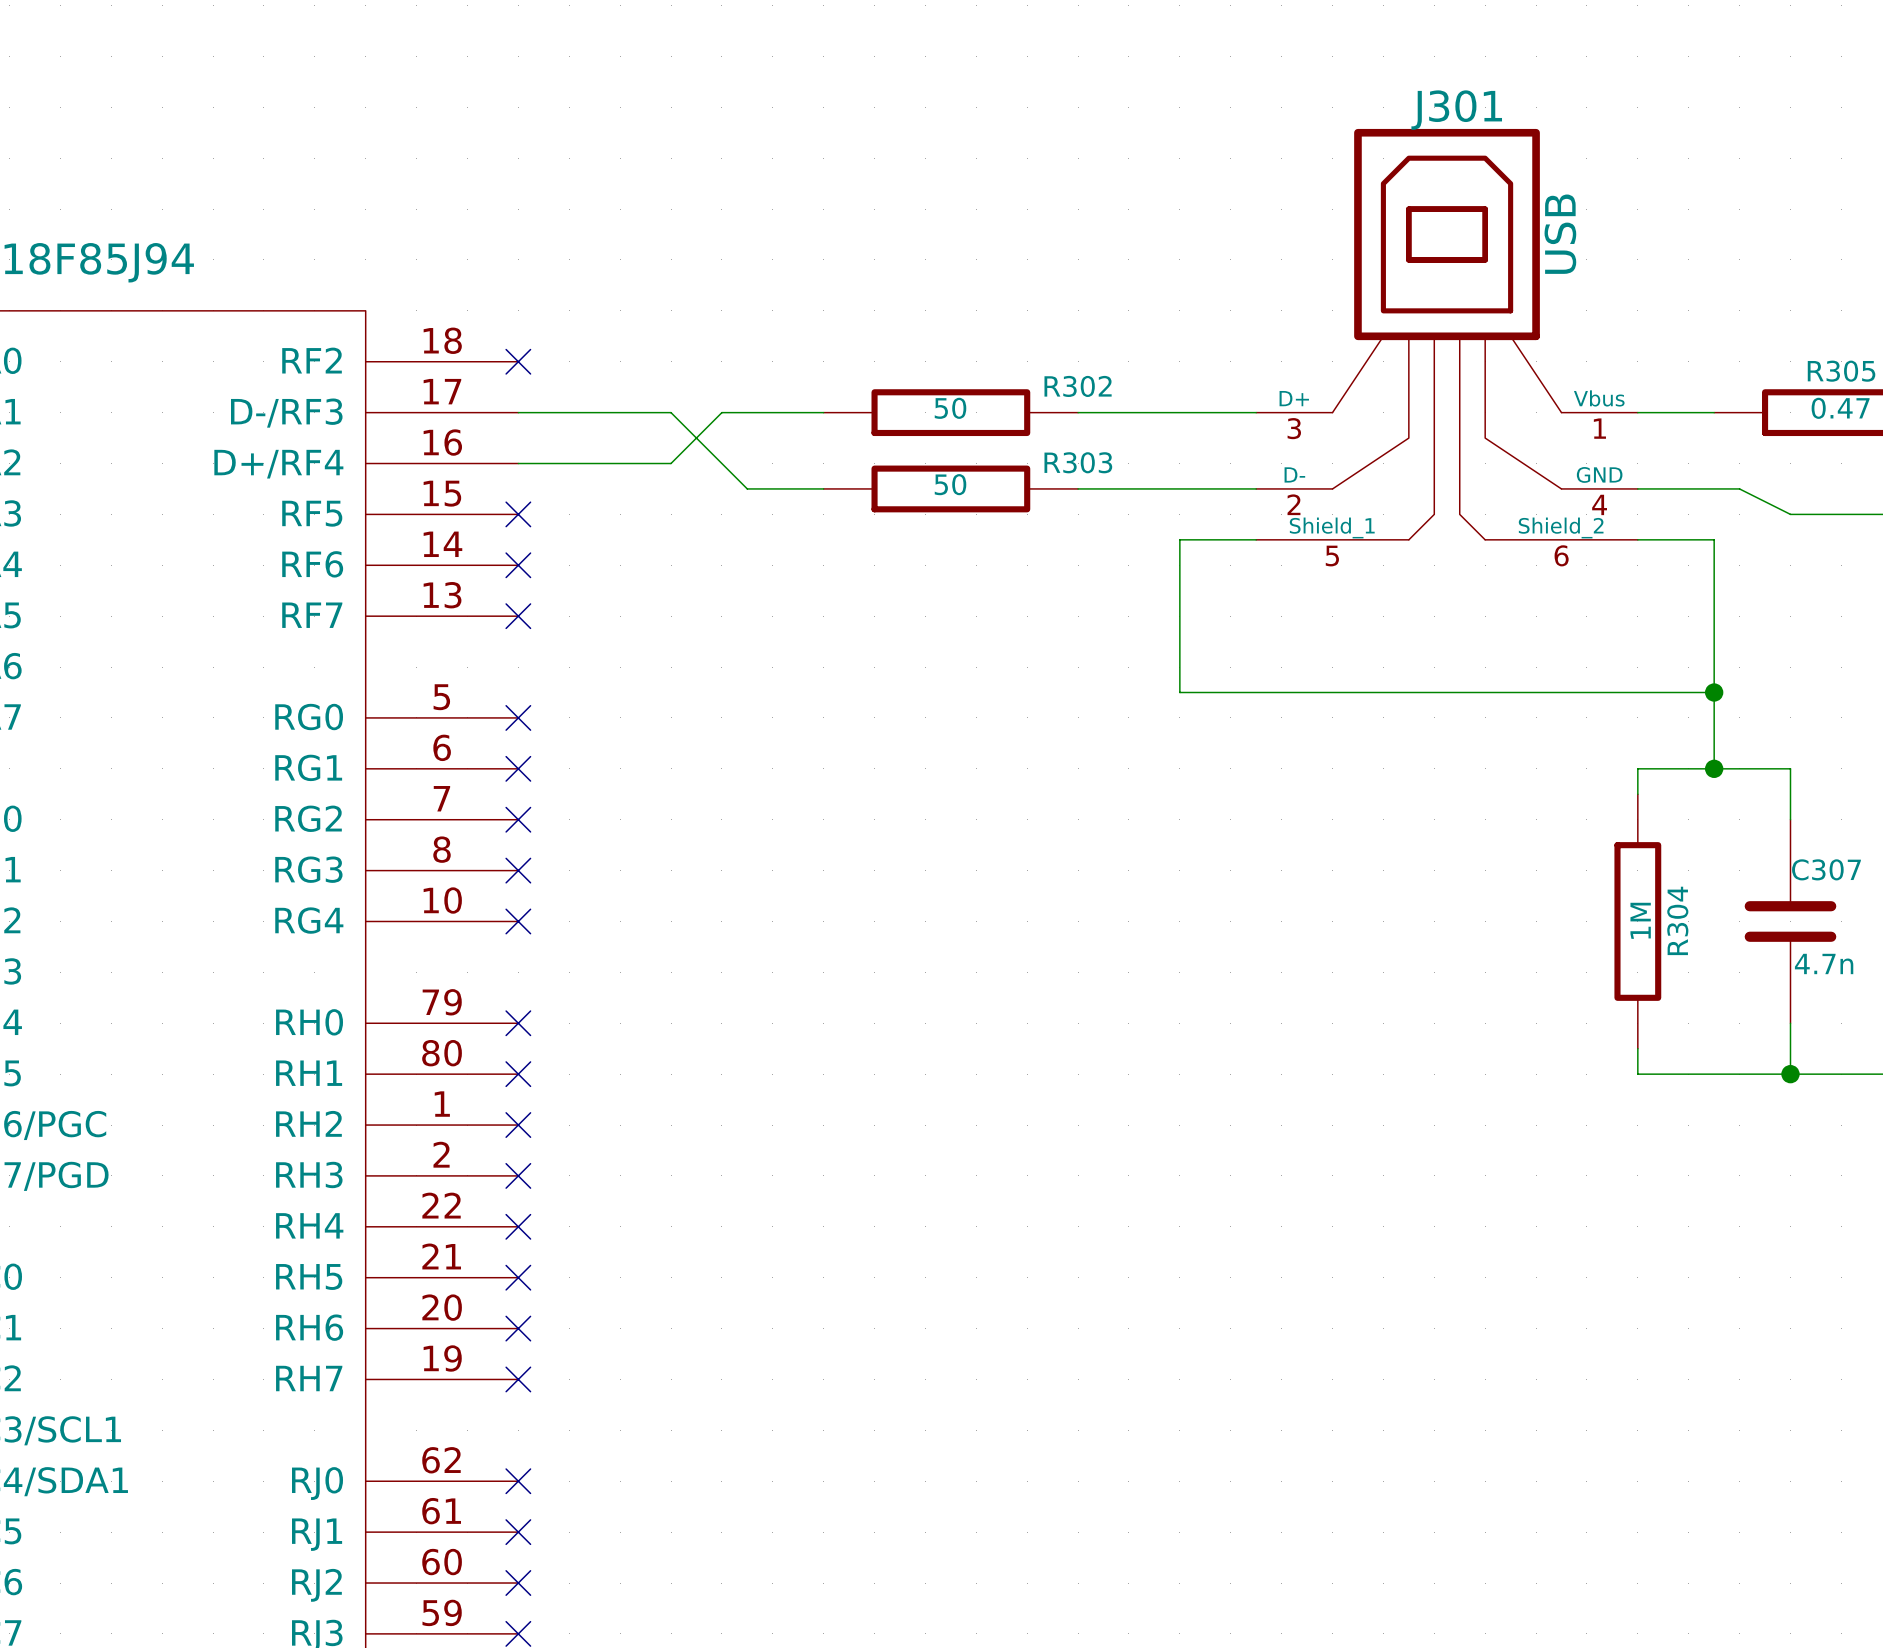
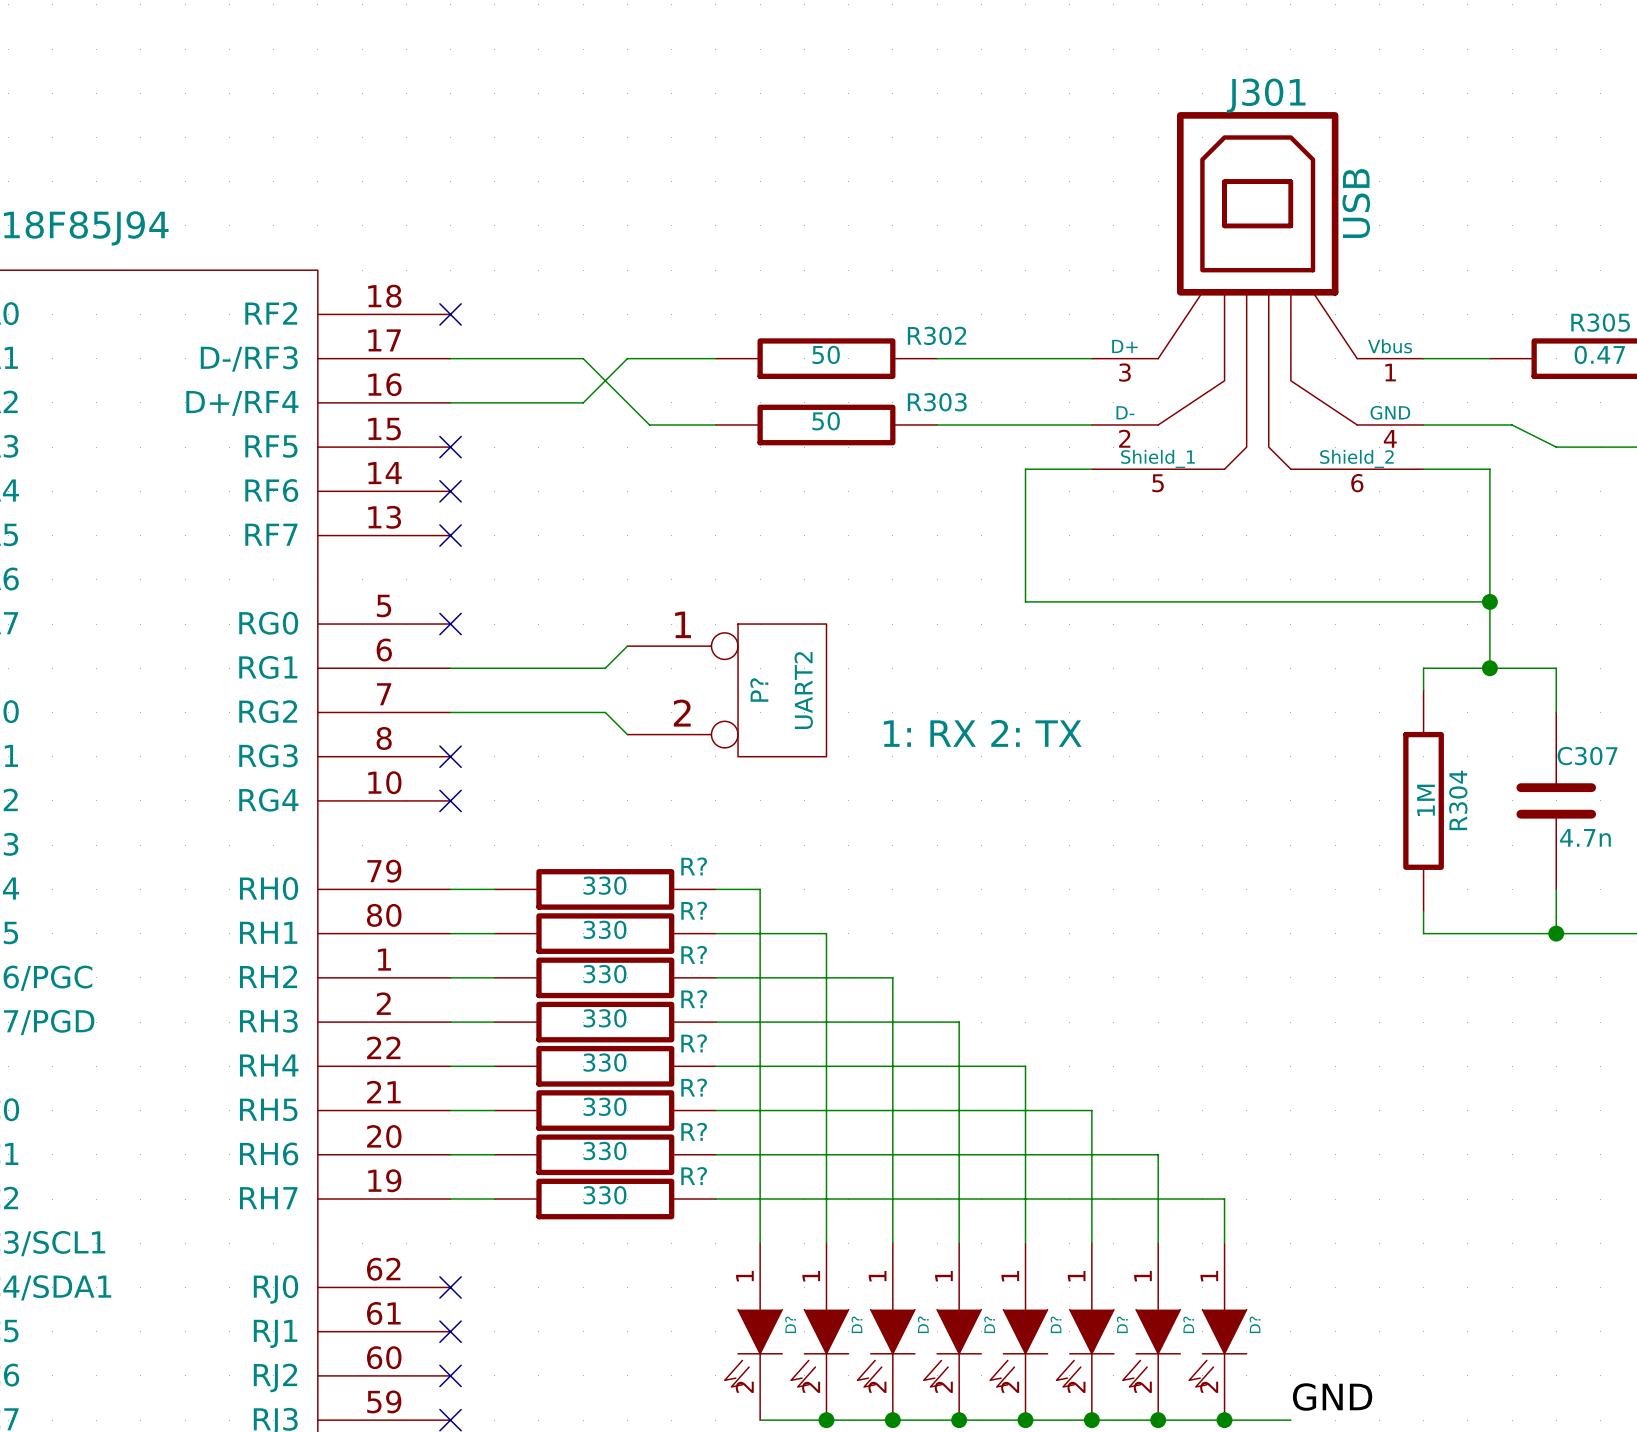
wire: none -> (627, 646) (605, 668) (450, 668)
no-connect mark: (518, 768) -> none
P?: none -> UART2 (726, 690)
wire: none -> (450, 712) (605, 712) (627, 734)
no-connect mark: (518, 819) -> none
wire: none -> (450, 889) (494, 889)
no-connect mark: (518, 1023) -> none
R?: none -> 330 (605, 889)
wire: none -> (715, 889) (760, 889) (760, 1243)
wire: none -> (450, 933) (494, 933)
no-connect mark: (518, 1074) -> none
R?: none -> 330 (605, 933)
wire: none -> (715, 933) (826, 933) (826, 1243)
wire: none -> (450, 977) (494, 977)
no-connect mark: (518, 1125) -> none
R?: none -> 330 (605, 977)
wire: none -> (715, 977) (892, 977) (892, 1243)
wire: none -> (450, 1022) (494, 1022)
no-connect mark: (518, 1175) -> none
R?: none -> 330 (605, 1022)
wire: none -> (715, 1022) (959, 1022) (959, 1243)
wire: none -> (450, 1066) (494, 1066)
no-connect mark: (518, 1226) -> none
R?: none -> 330 (605, 1066)
wire: none -> (715, 1066) (1025, 1066) (1025, 1243)
wire: none -> (450, 1110) (494, 1110)
no-connect mark: (518, 1277) -> none
R?: none -> 330 (605, 1110)
wire: none -> (715, 1110) (1091, 1110) (1091, 1243)
wire: none -> (450, 1154) (494, 1154)
no-connect mark: (518, 1328) -> none
R?: none -> 330 (605, 1154)
wire: none -> (715, 1154) (1158, 1154) (1158, 1243)
wire: none -> (450, 1199) (494, 1199)
no-connect mark: (518, 1379) -> none
R?: none -> 330 (605, 1199)
wire: none -> (715, 1199) (1224, 1199) (1224, 1243)
D?: none -> (753, 1331)
D?: none -> (819, 1331)
D?: none -> (886, 1331)
D?: none -> (952, 1331)
D?: none -> (1018, 1331)
D?: none -> (1085, 1331)
D?: none -> (1151, 1331)
D?: none -> (1217, 1331)
label: none -> GND (1332, 1397)
wire: none -> (760, 1420) (1290, 1420)
junction: none -> (826, 1420)
junction: none -> (892, 1420)
junction: none -> (959, 1420)
junction: none -> (1025, 1420)
junction: none -> (1091, 1420)
junction: none -> (1158, 1420)
junction: none -> (1224, 1420)

